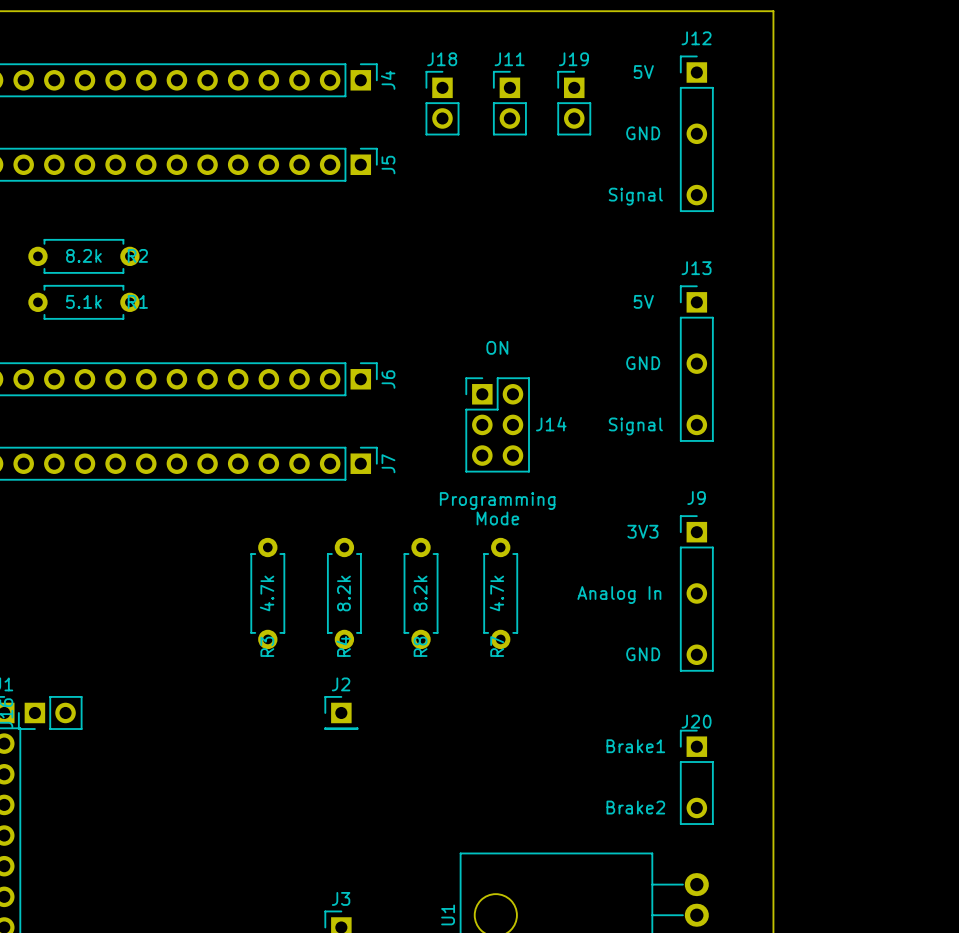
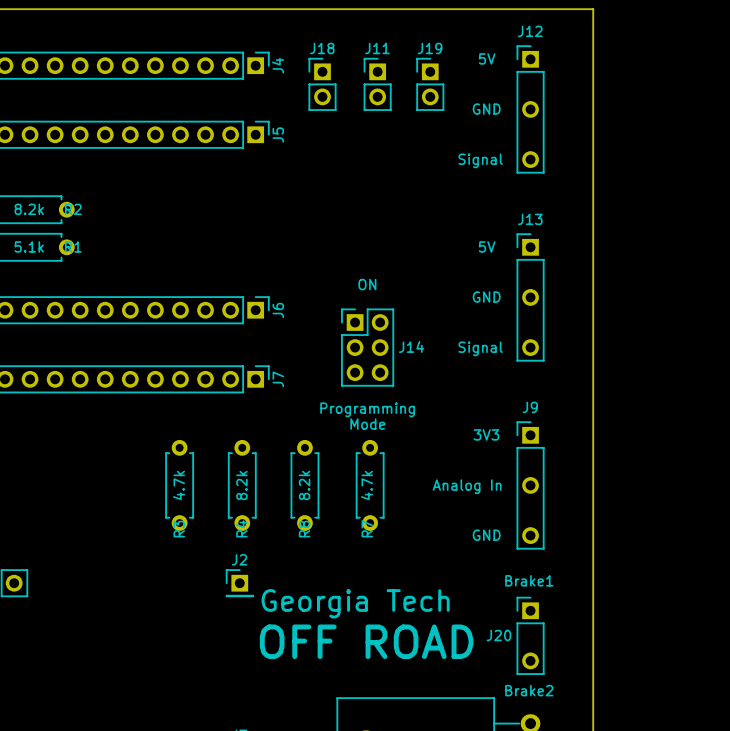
J20 name position: J20 (696, 721) -> J20 (498, 635)
text: none -> Georgia Tech (355, 603)
text position: Brake1 (635, 746) -> Brake1 (529, 580)
text: none -> OFF ROAD (366, 641)
text position: Brake2 (635, 807) -> Brake2 (529, 690)

